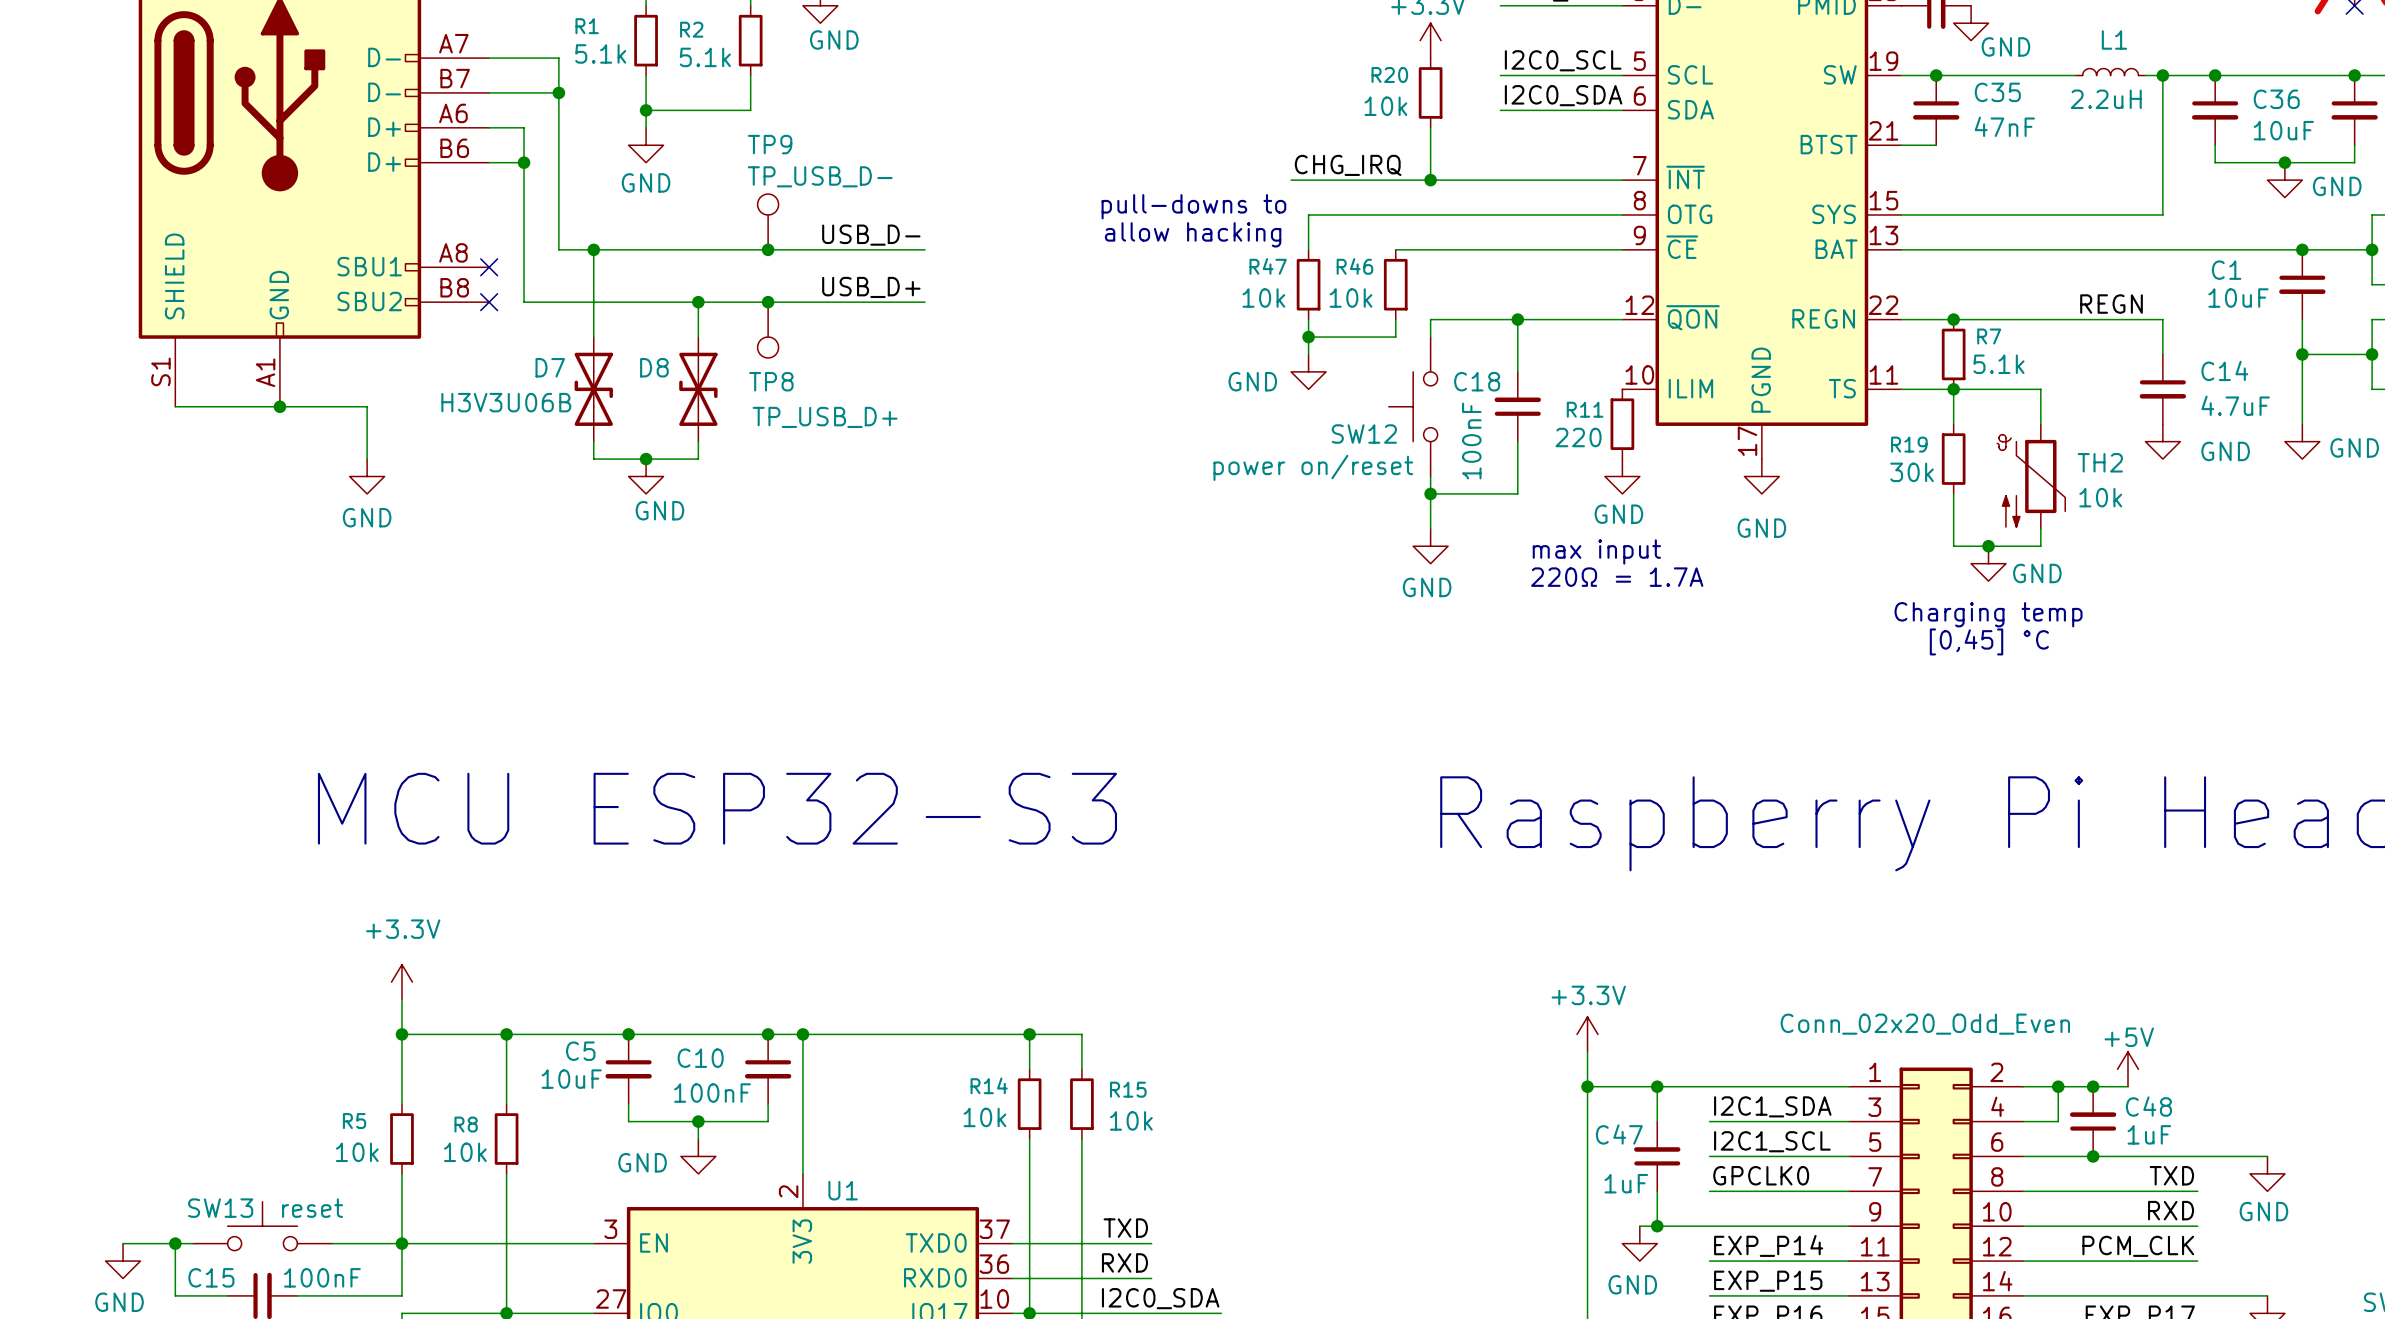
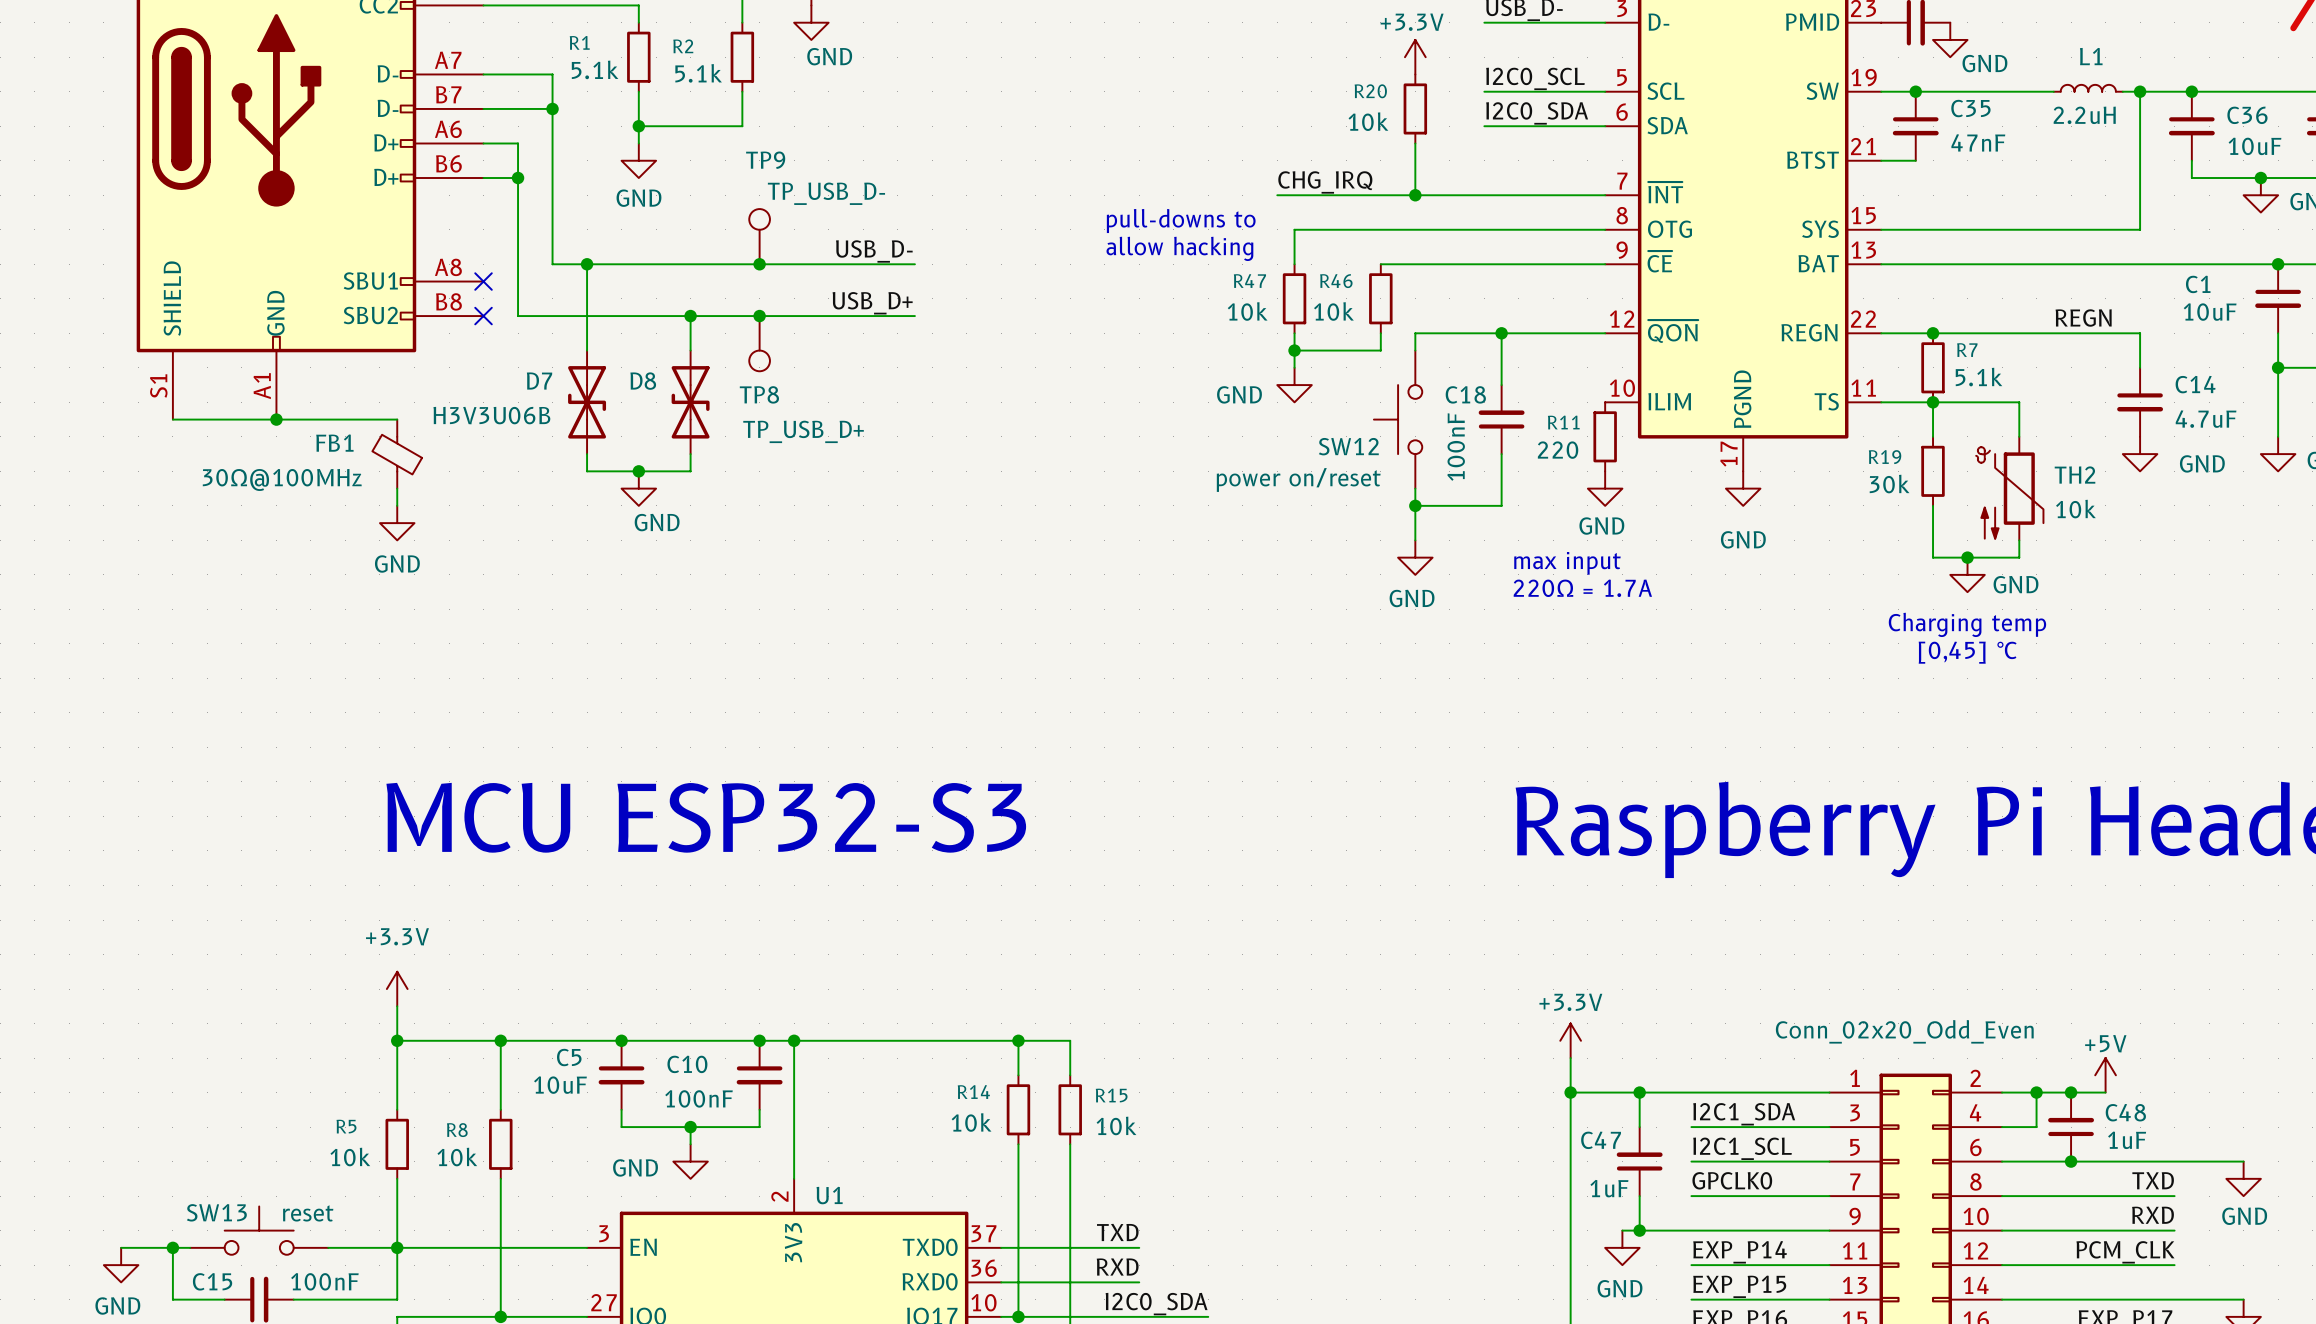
wire: (367, 406) (367, 459) -> (362, 419) (397, 419)
FB1: none -> 30Ω@100MHz (397, 454)
power symbol position: GND (367, 476) -> GND (397, 523)
wire: none -> (397, 488) (397, 505)

